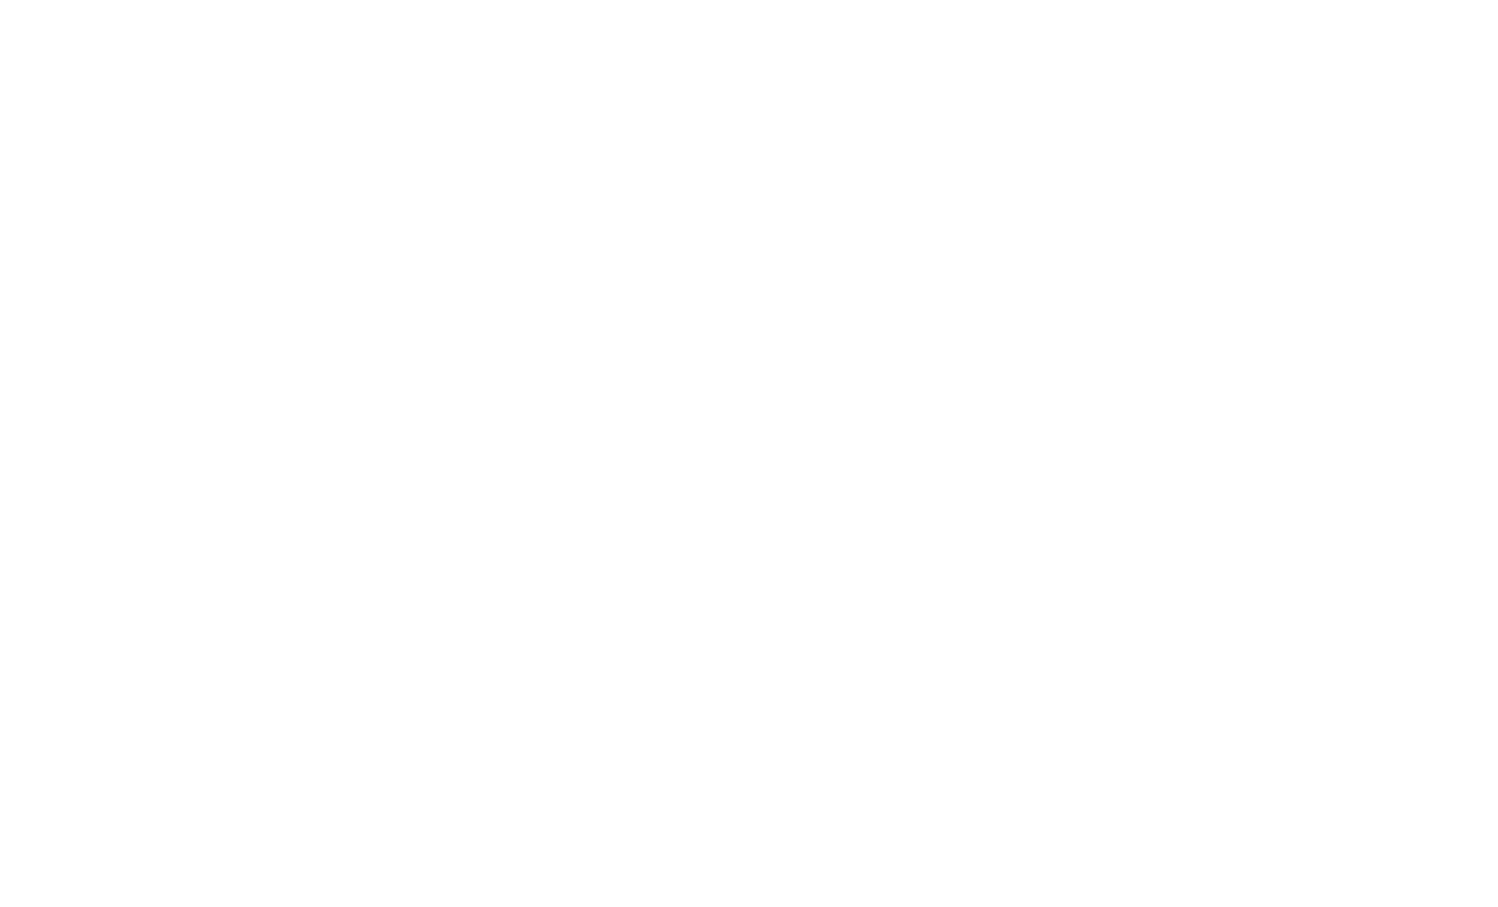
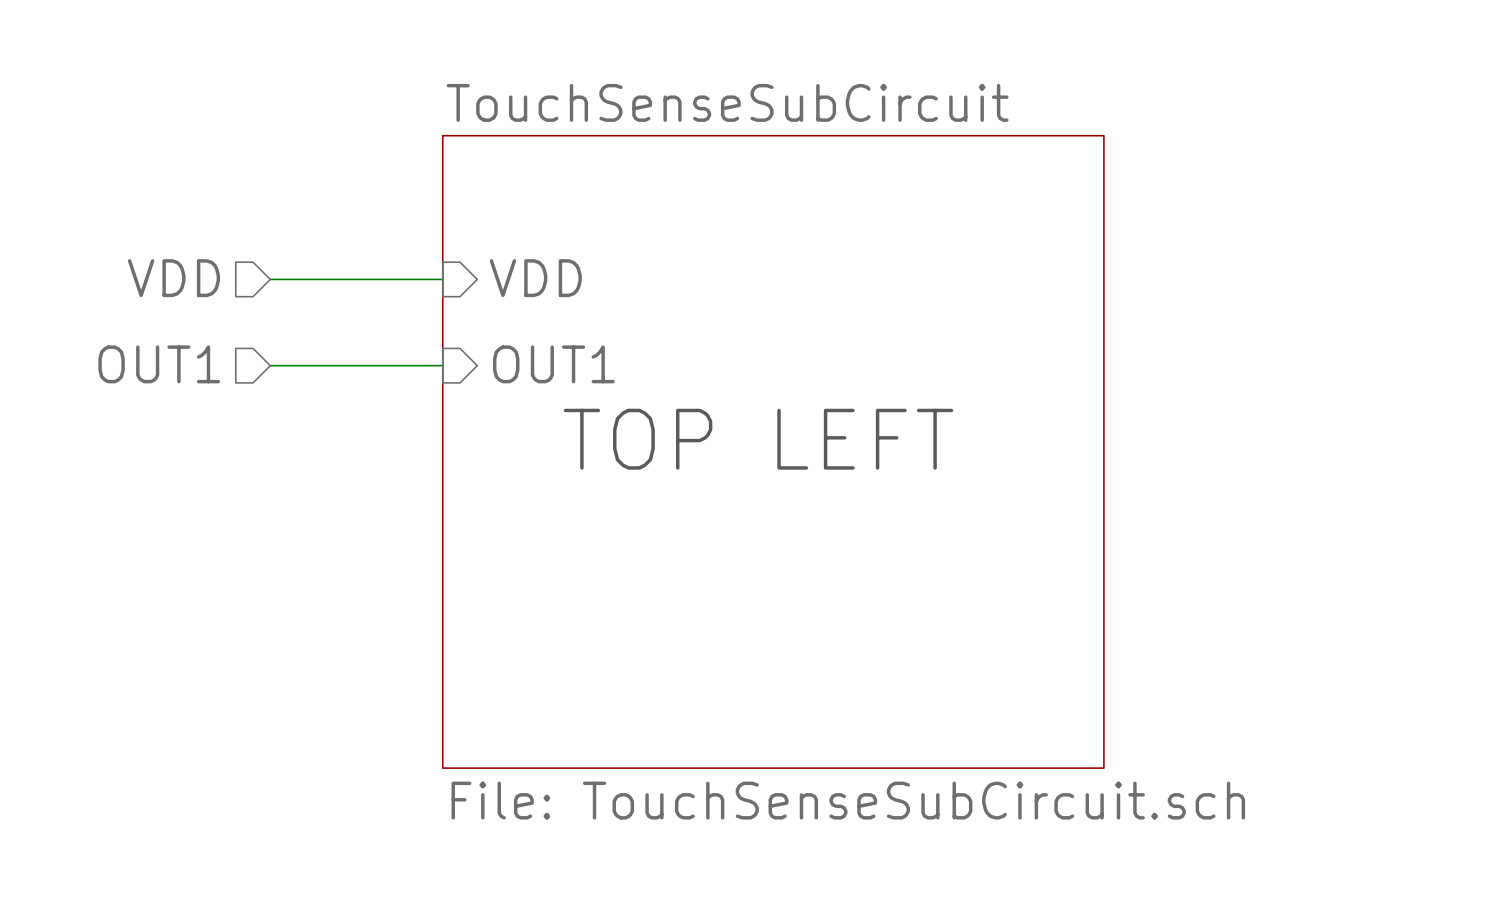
hierarchical label: none -> VDD (173, 278)
sheet pin: none -> VDD (535, 278)
wire: none -> (270, 279) (442, 279)
hierarchical label: none -> OUT1 (159, 364)
sheet pin: none -> OUT1 (553, 364)
wire: none -> (270, 365) (442, 365)
text: none -> TOP LEFT (758, 439)
sheet TouchSenseSubCircuit: none -> File: TouchSenseSubCircuit.sch (773, 451)

